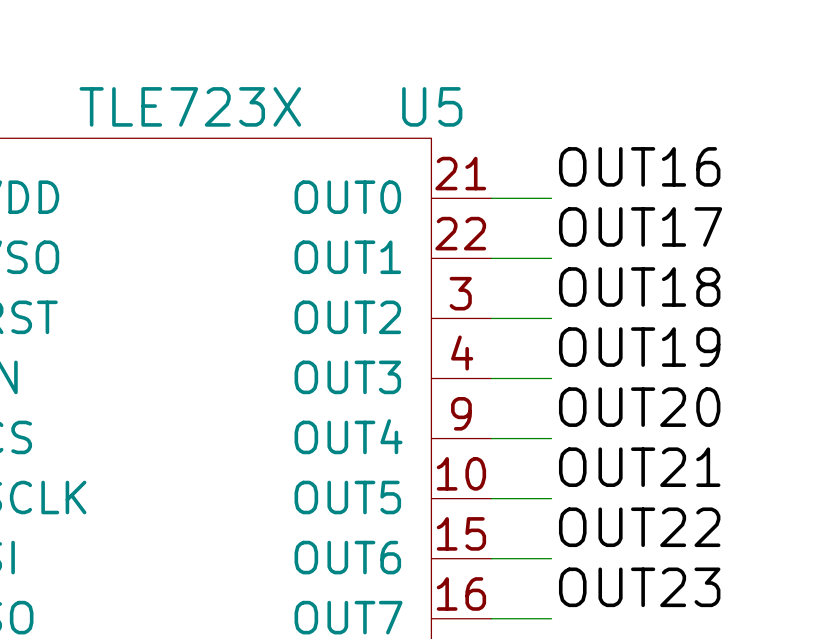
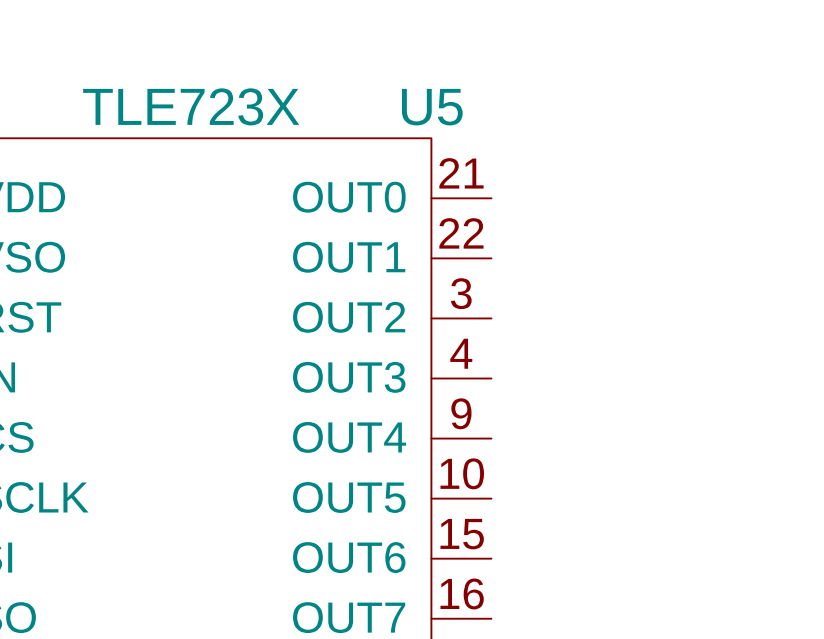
label: OUT16 (639, 166) -> none
wire: (491, 198) (551, 198) -> none
label: OUT17 (640, 226) -> none
wire: (491, 258) (551, 258) -> none
label: OUT18 (639, 287) -> none
wire: (491, 318) (551, 318) -> none
label: OUT19 (639, 347) -> none
wire: (491, 378) (551, 378) -> none
label: OUT20 (639, 407) -> none
wire: (491, 438) (551, 438) -> none
label: OUT21 (639, 467) -> none
wire: (491, 498) (551, 498) -> none
label: OUT22 (639, 527) -> none
wire: (491, 558) (551, 558) -> none
label: OUT23 (639, 587) -> none
wire: (491, 618) (551, 618) -> none

